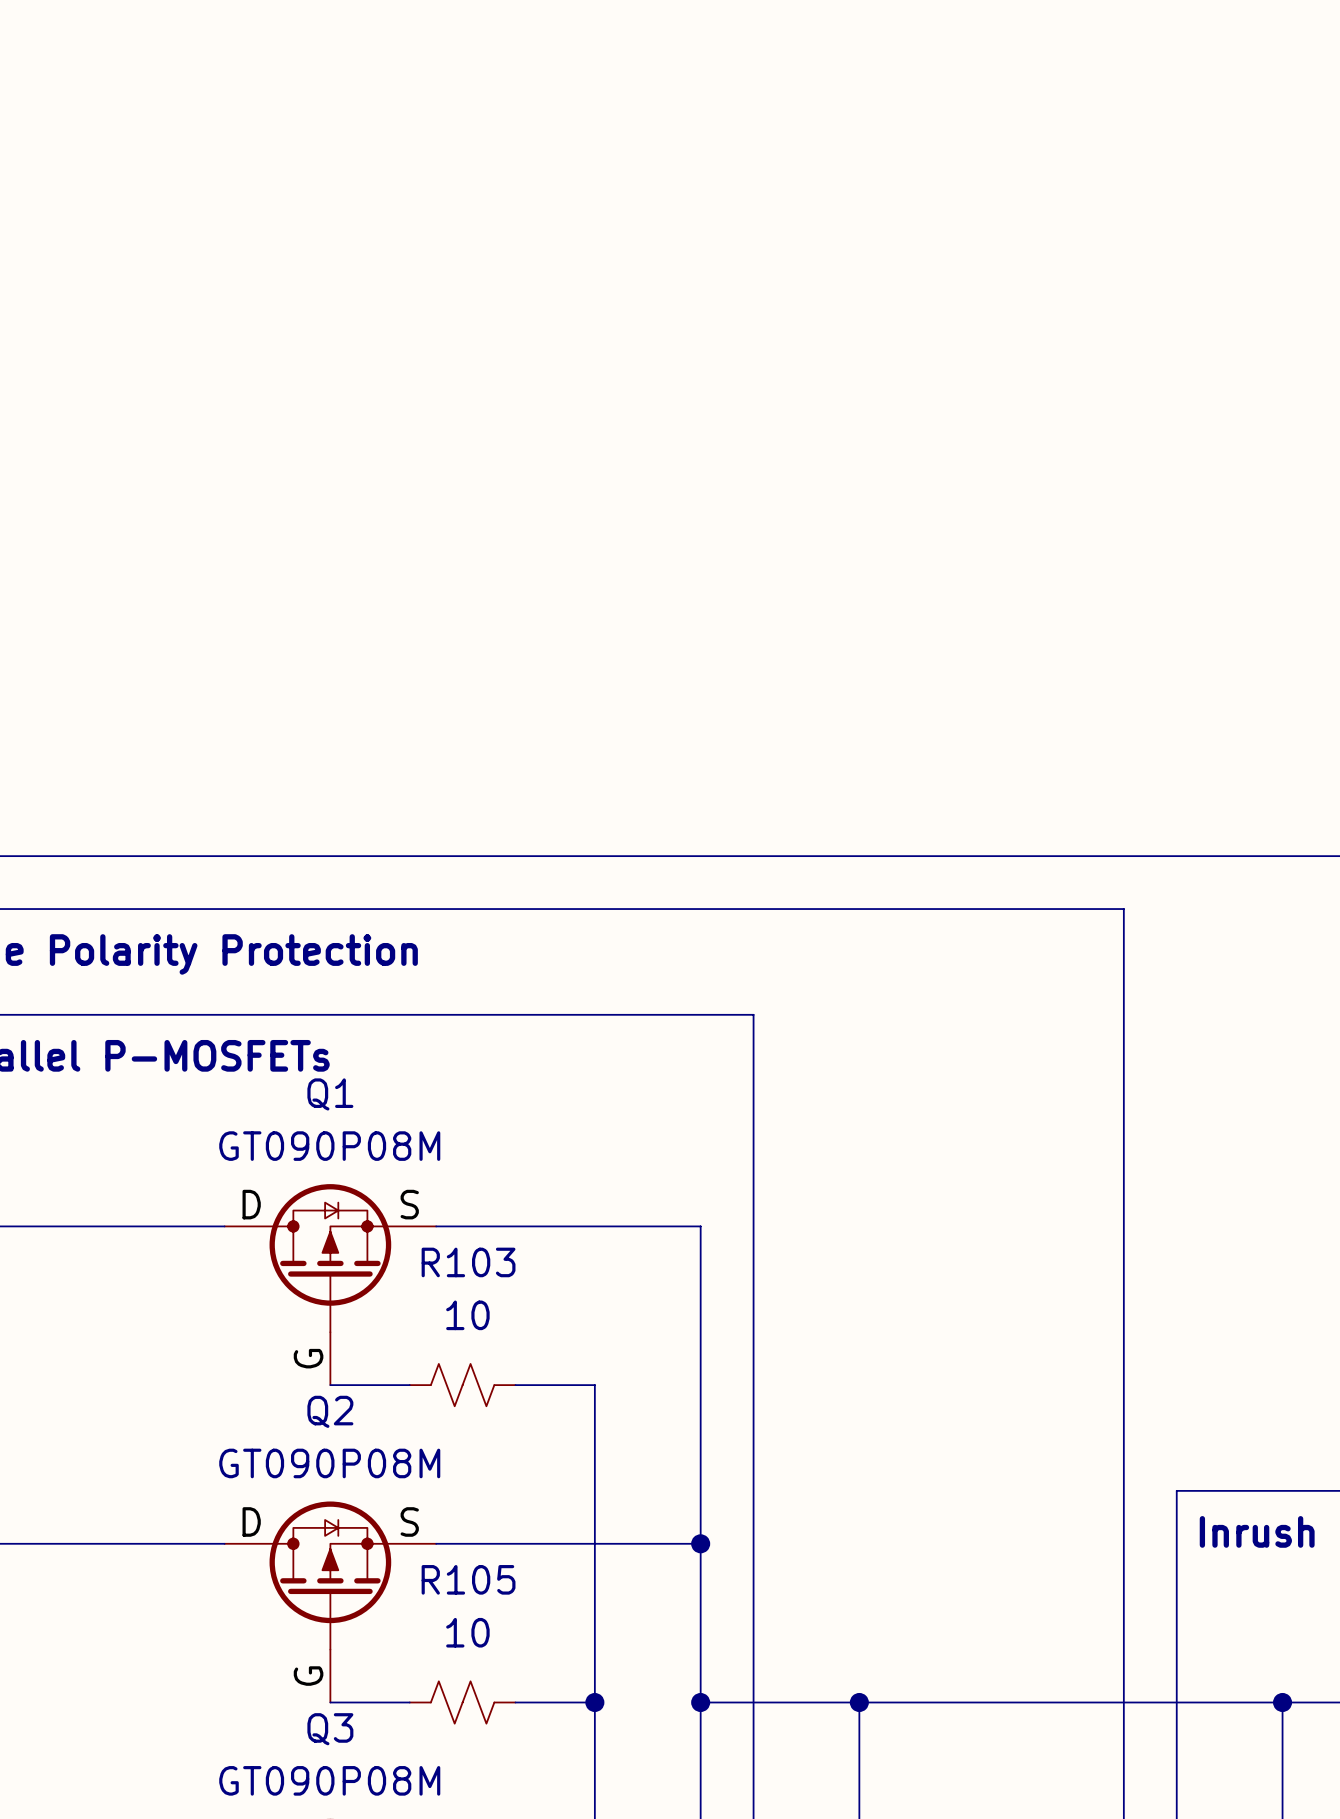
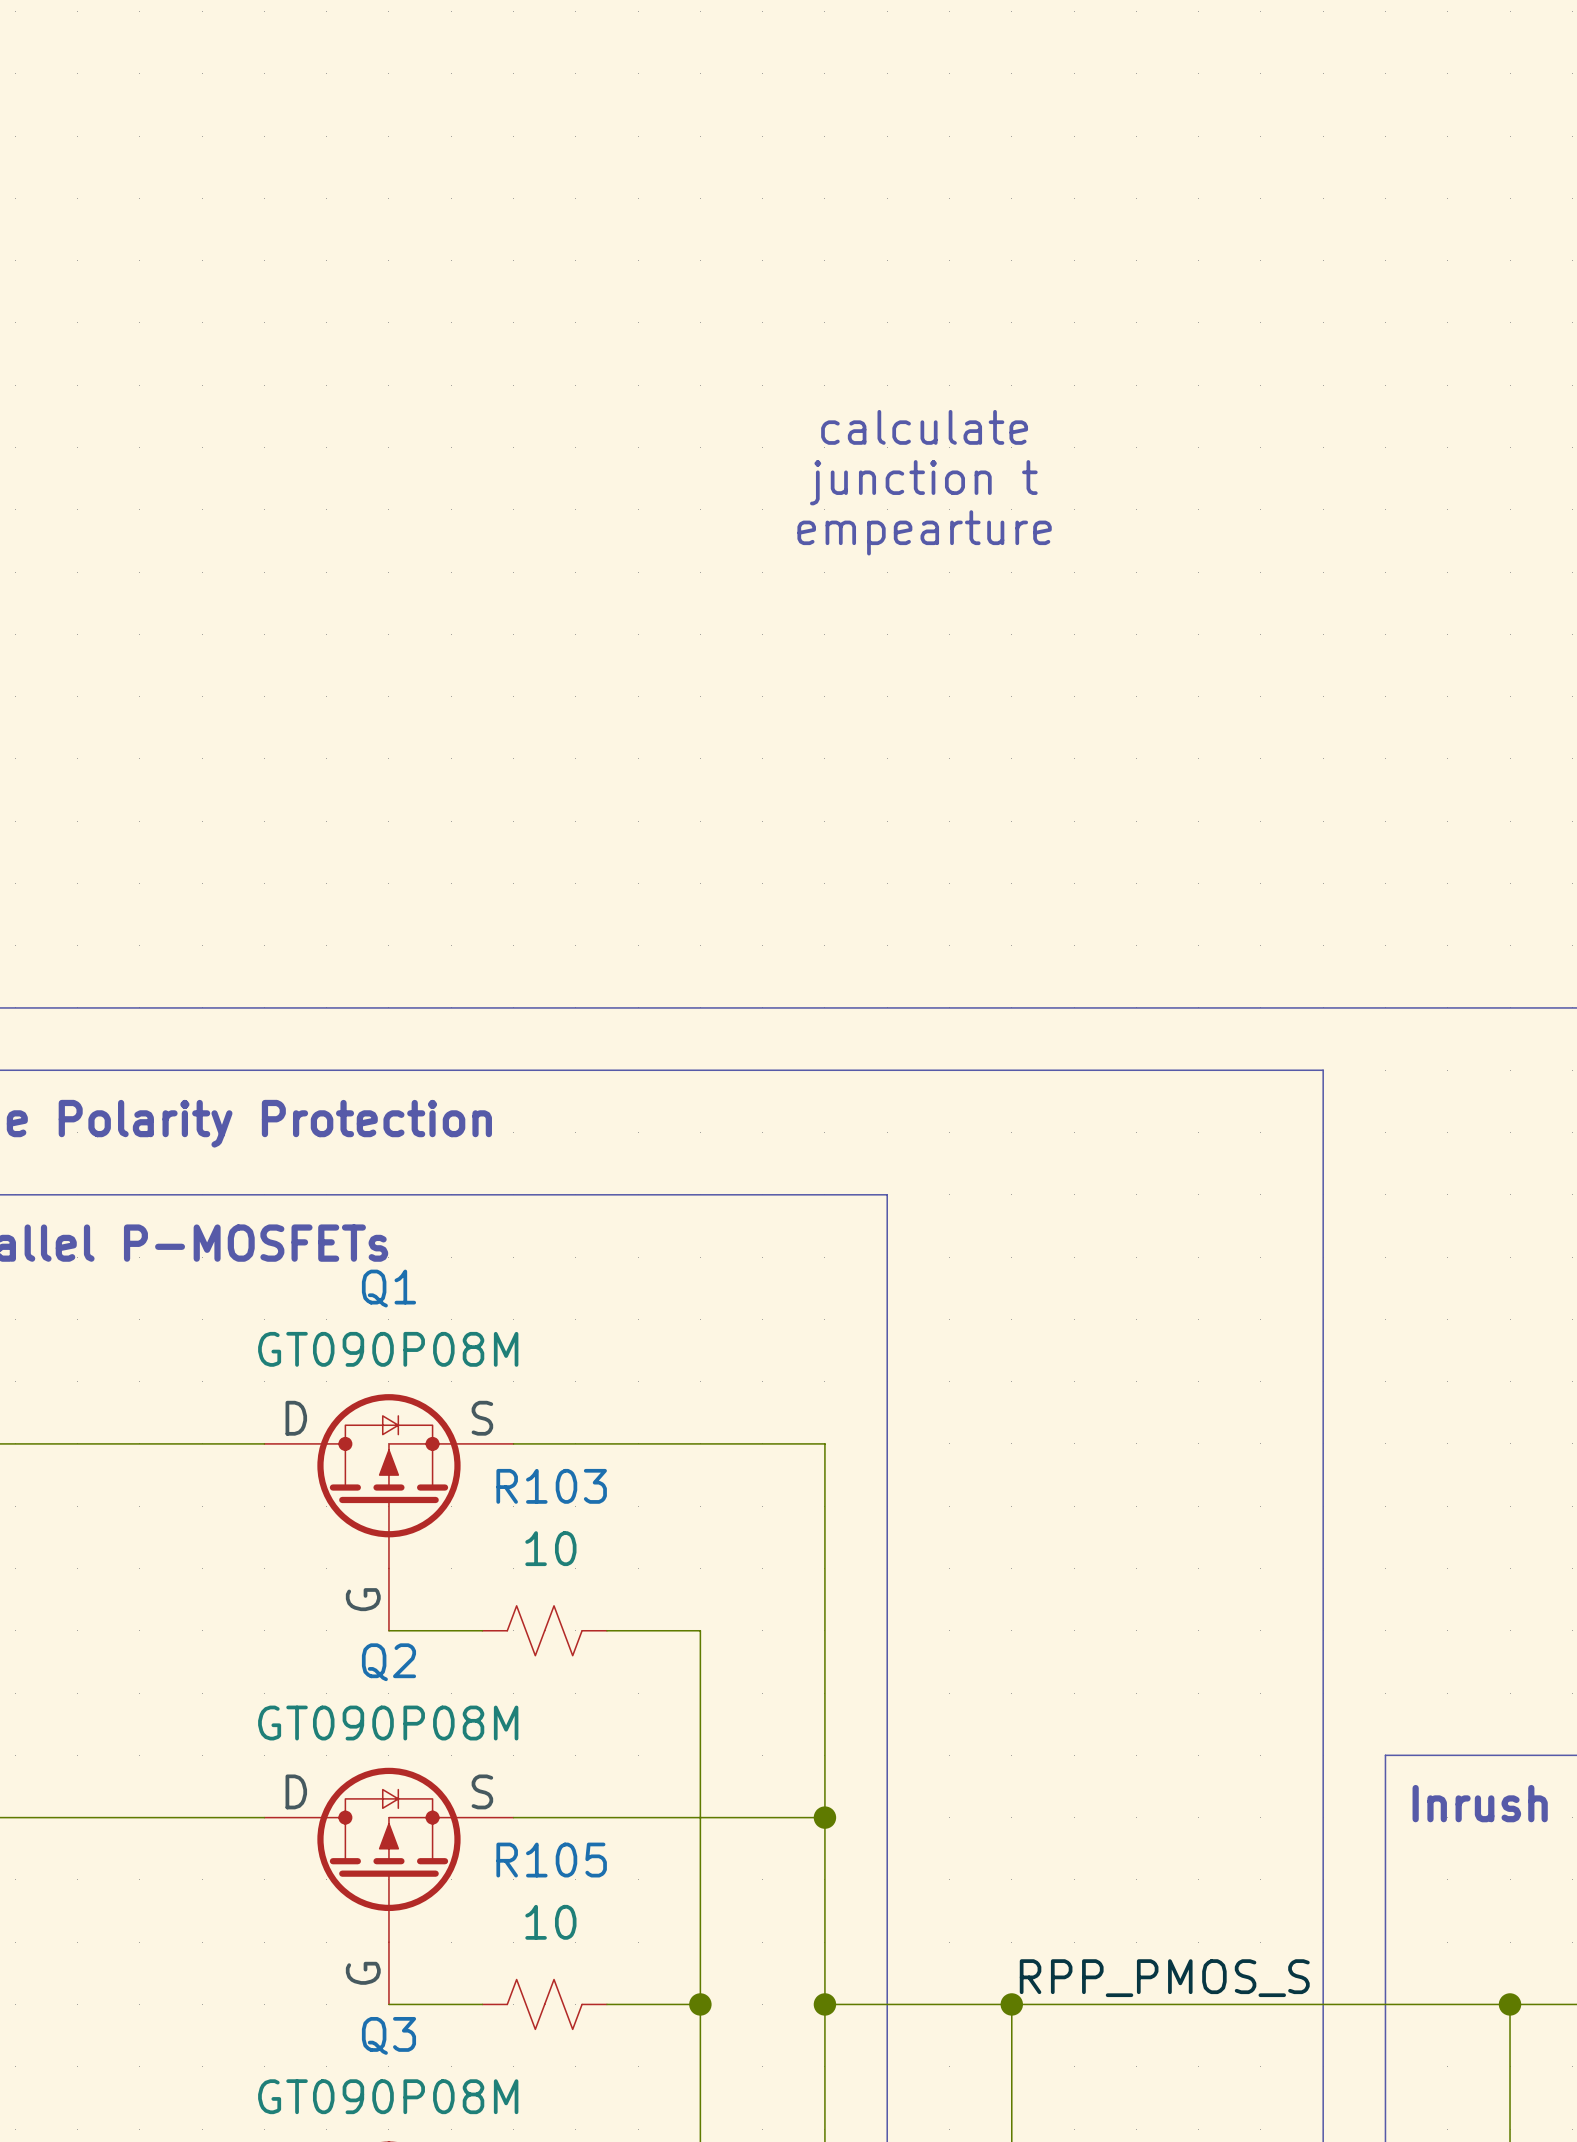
text: none -> calculate (924, 427)
text: none -> junction t (923, 482)
text: none -> empearture (924, 532)
label: none -> RPP_PMOS_S (1164, 1978)

